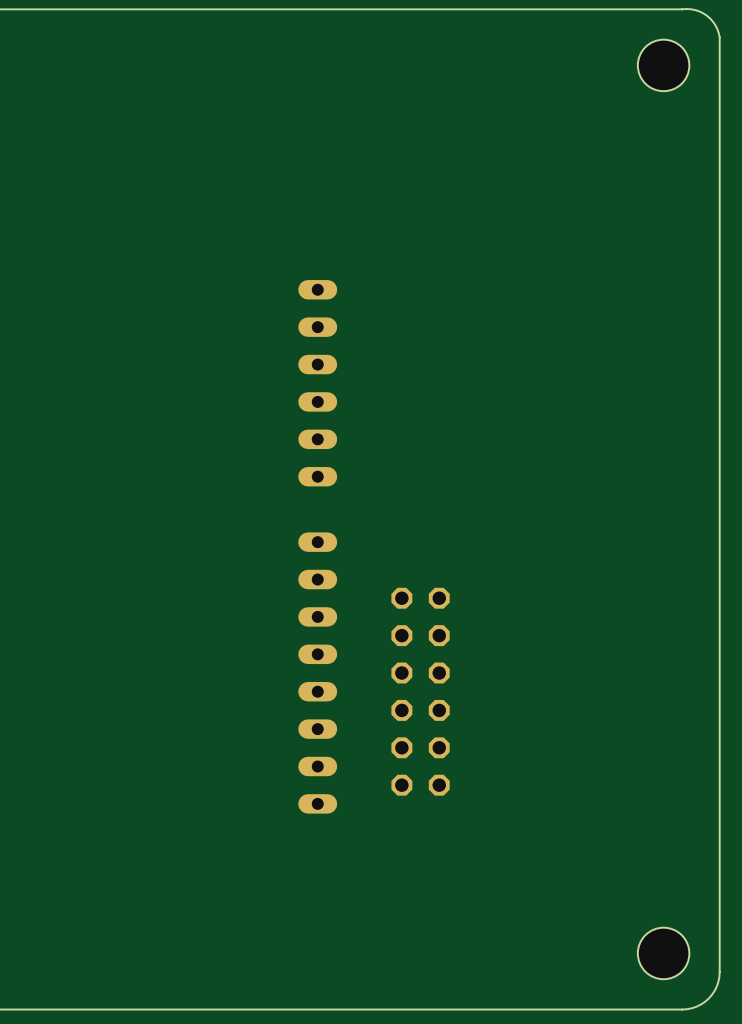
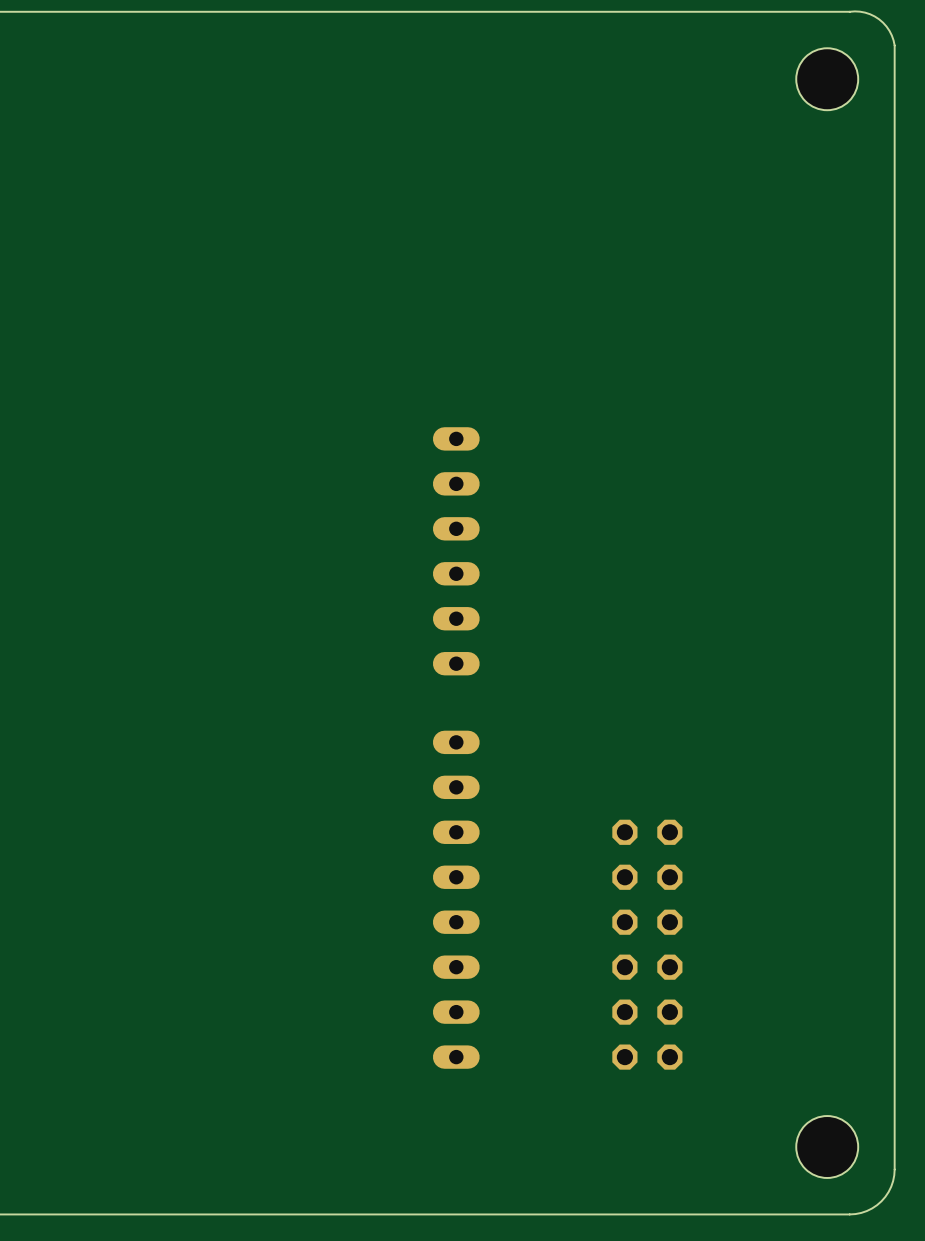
part position: (317, 383) -> (456, 551)
part position: (317, 673) -> (456, 899)
part position: (420, 691) -> (647, 944)

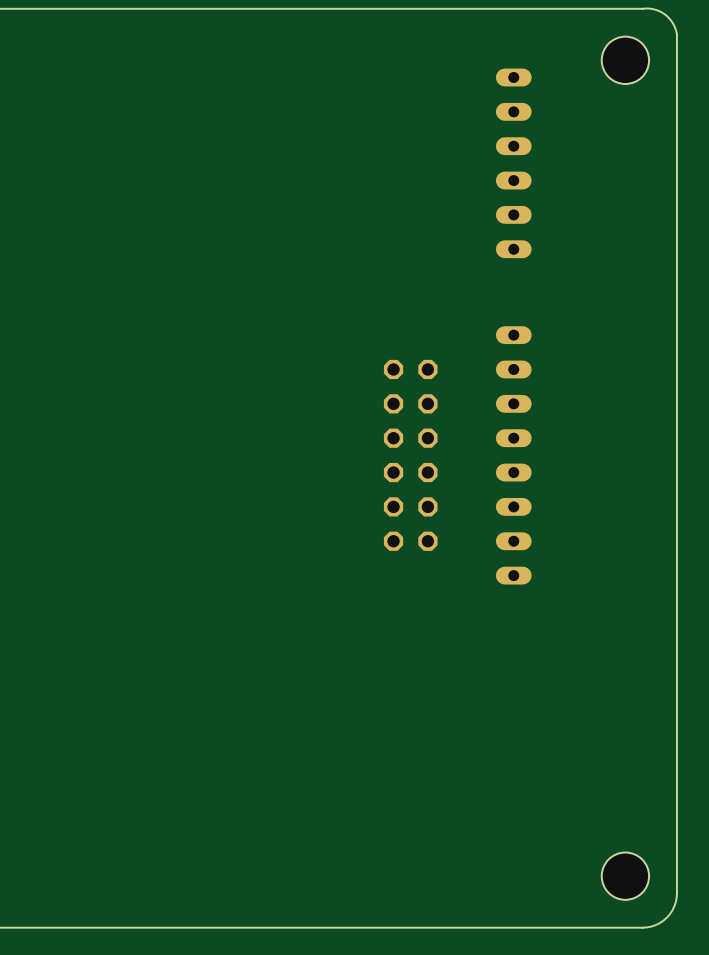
part position: (456, 551) -> (513, 163)
part position: (456, 899) -> (513, 455)
part position: (647, 944) -> (410, 455)

